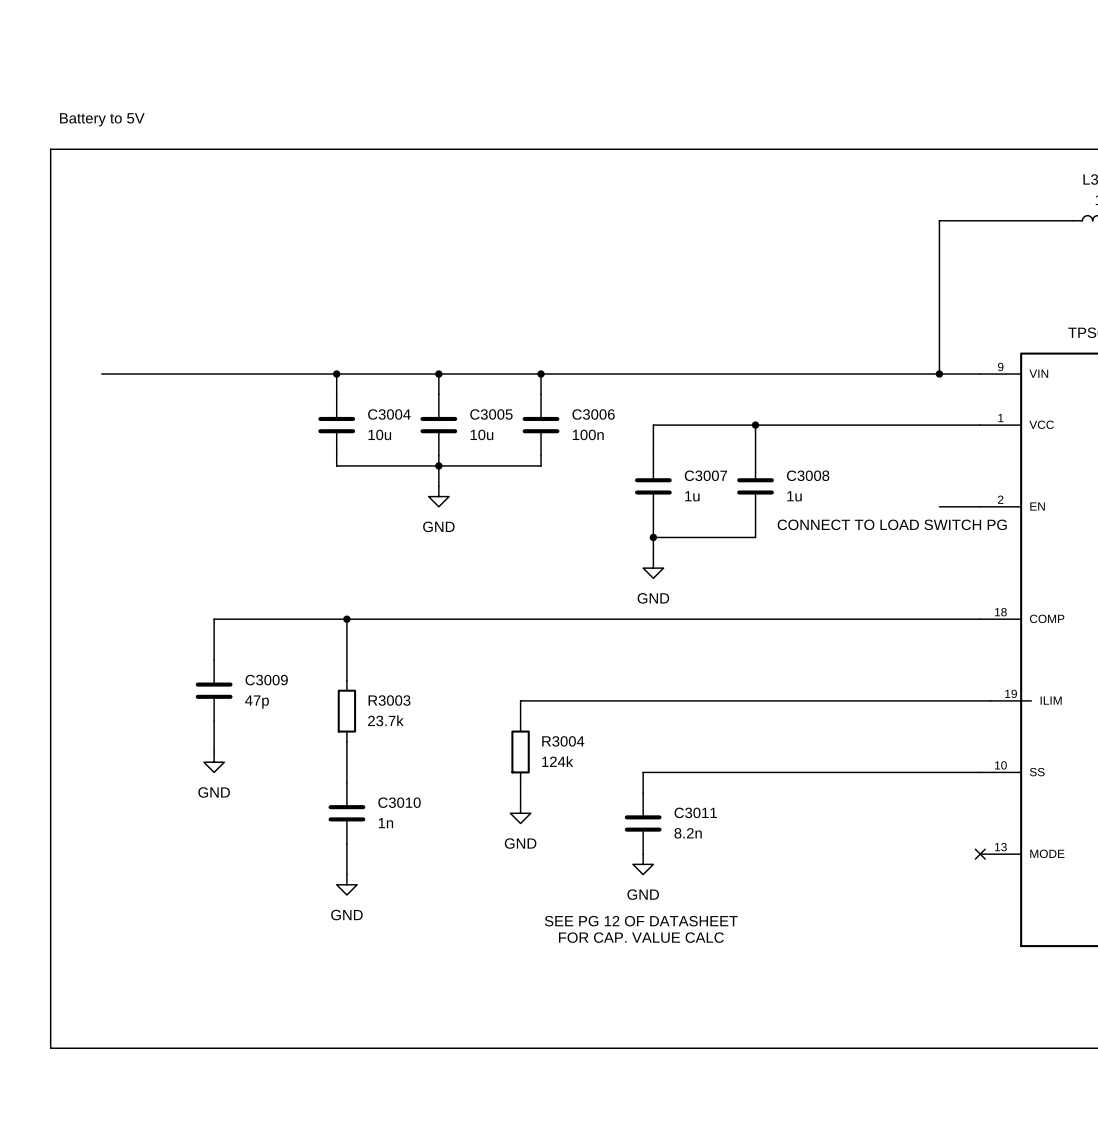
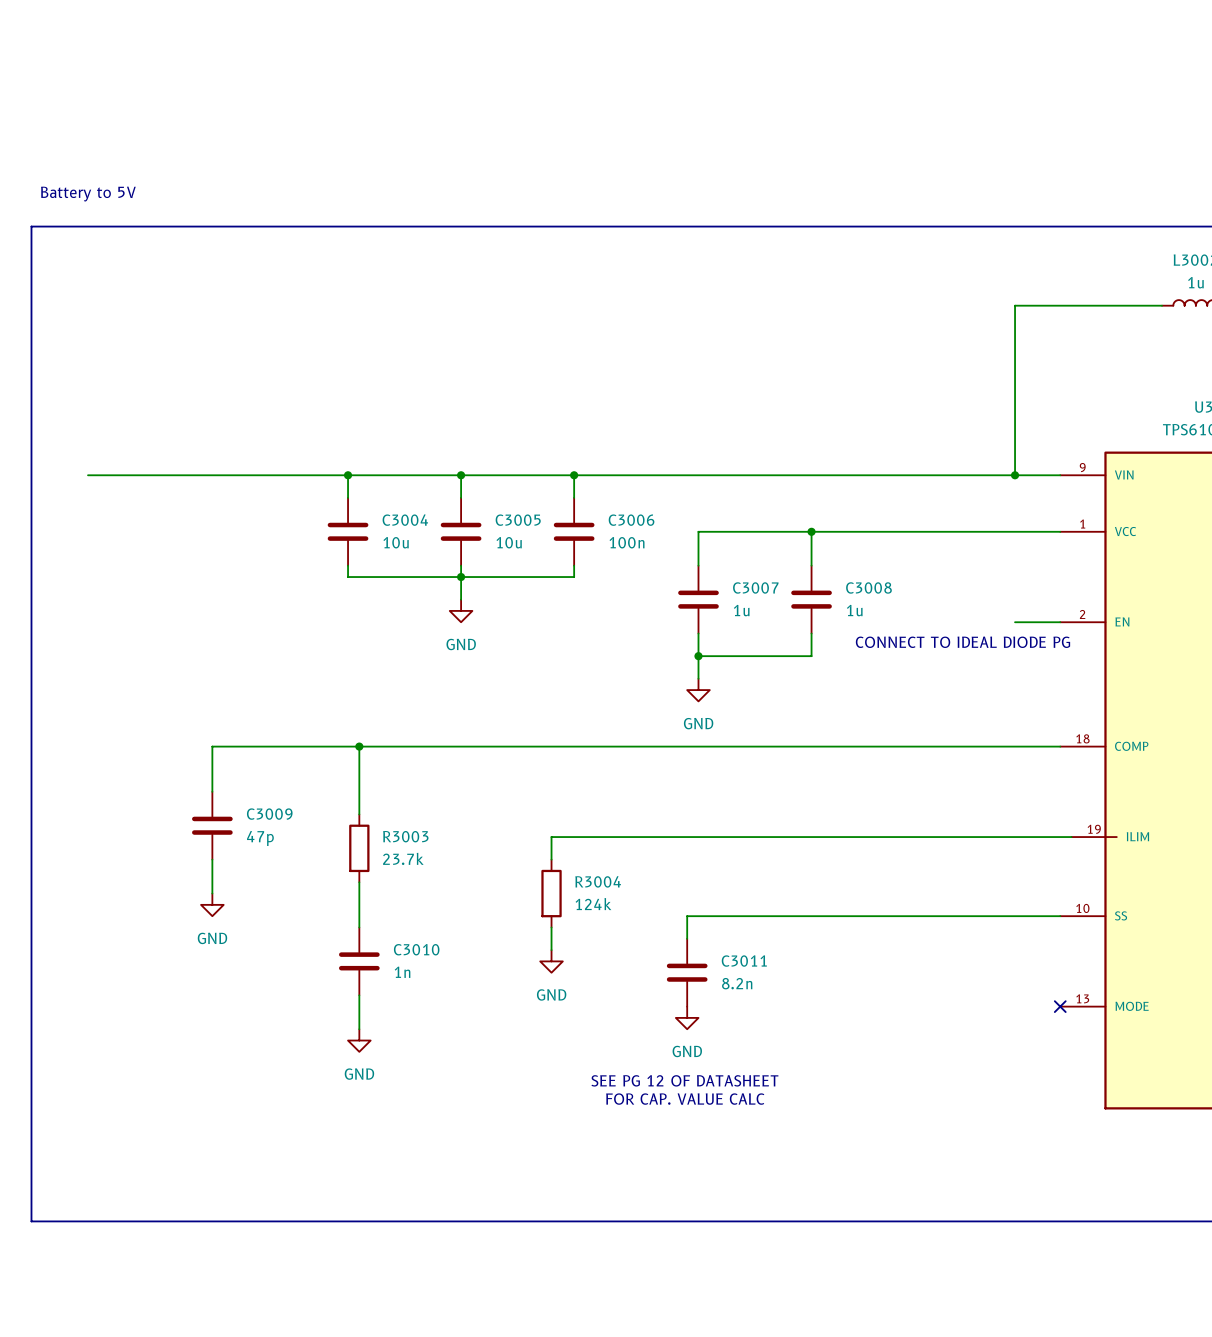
text: CONNECT TO LOAD SWITCH PG (892, 524) -> CONNECT TO IDEAL DIODE PG (962, 642)

